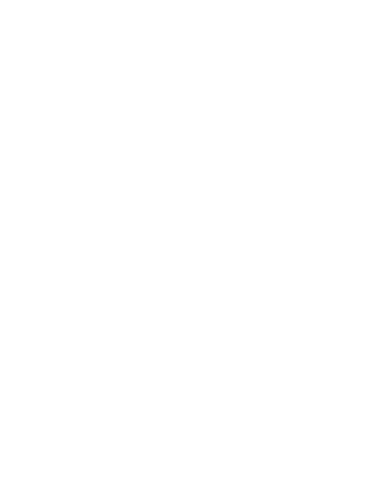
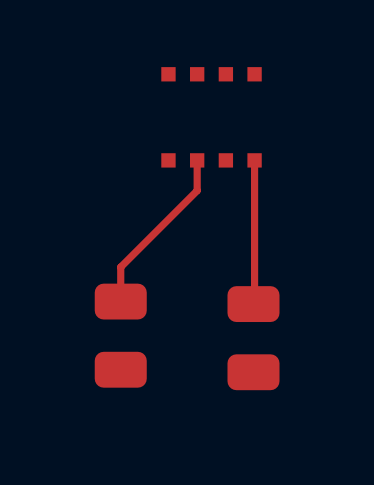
part: none -> (211, 117)
top track: none -> (197, 160) (197, 190) (120, 267) (120, 301)
top track: none -> (254, 160) (253, 304)
part: none -> (120, 335)
part: none -> (253, 338)

